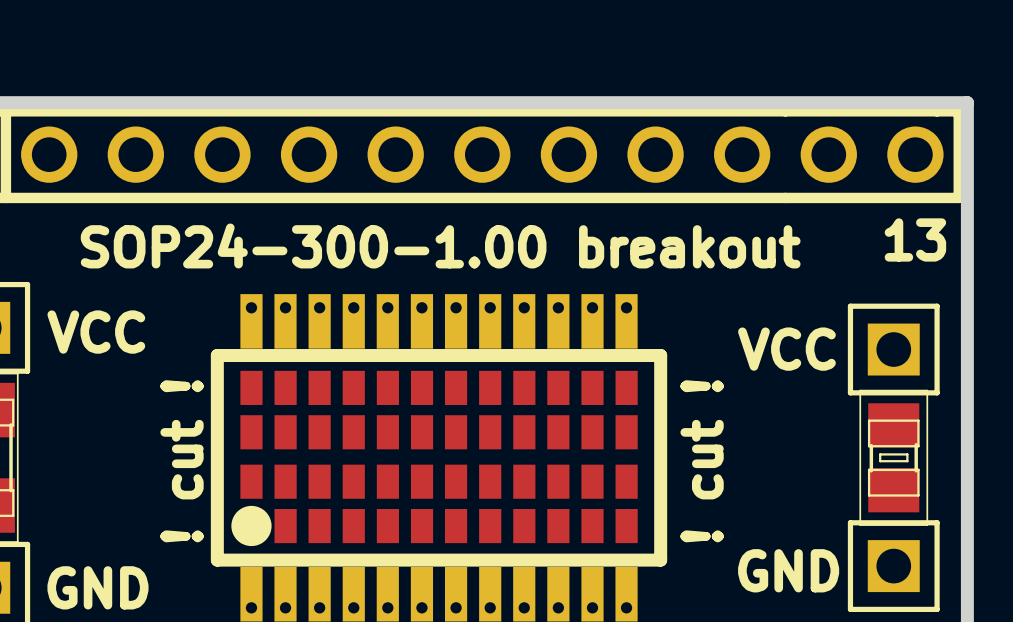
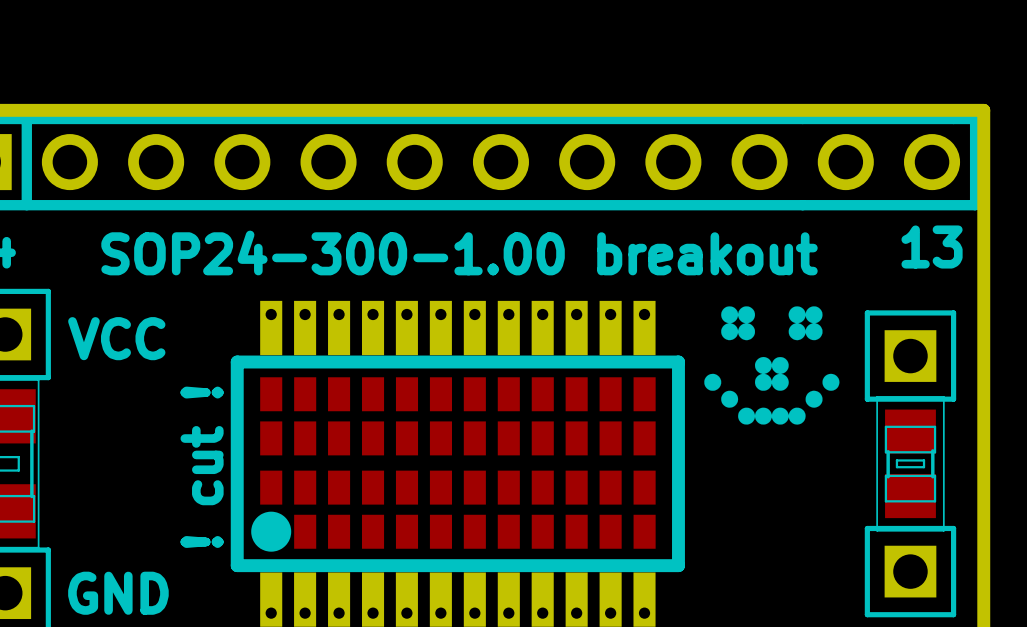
drawing: none -> [704, 306, 840, 425]
text: VCC (786, 349) -> none
text: ! cut ! (702, 461) -> none
text: GND (788, 570) -> none

